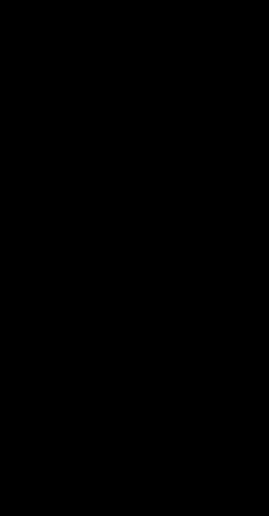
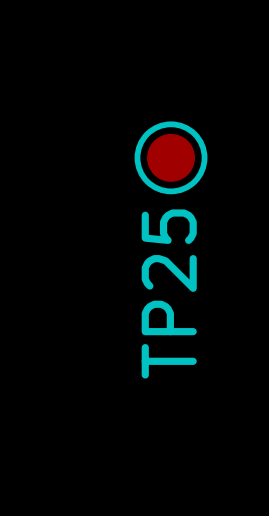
TP25: none -> (171, 157)

